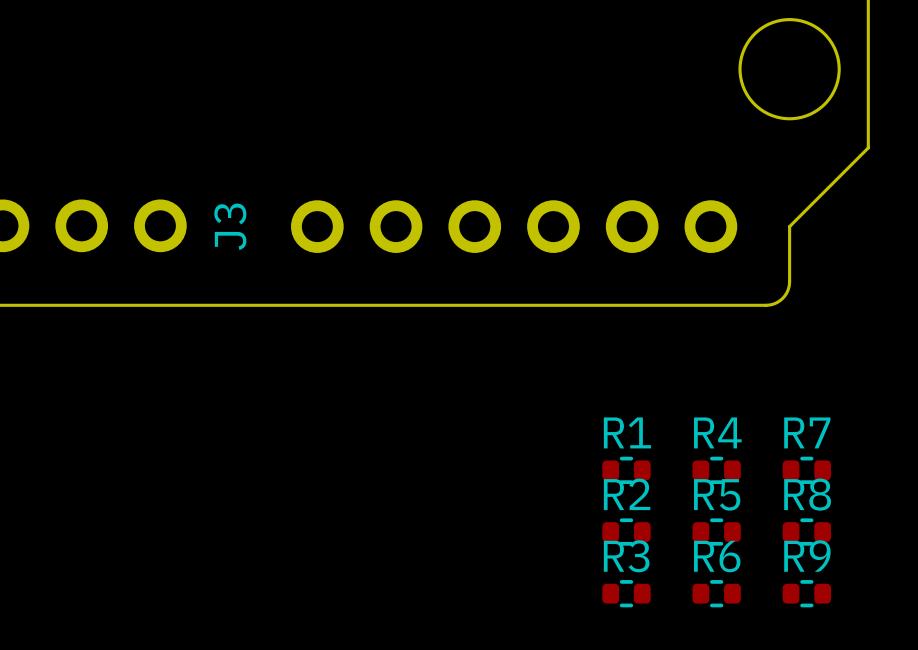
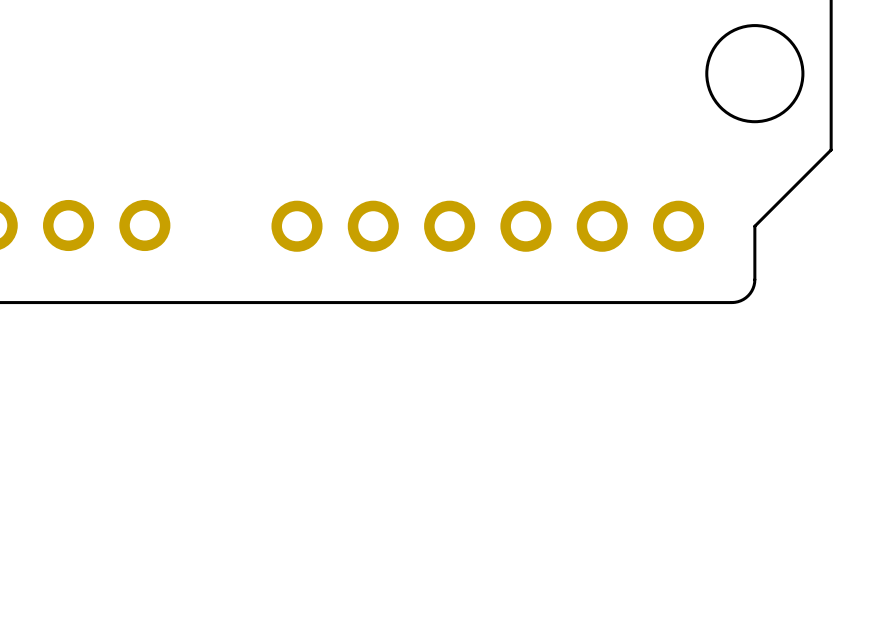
J3 name: J3 (230, 226) -> none
R1: (626, 470) -> none
R4: (716, 470) -> none
R7: (806, 470) -> none
R2: (626, 532) -> none
R5: (716, 532) -> none
R8: (806, 532) -> none
R3: (626, 593) -> none
R6: (716, 593) -> none
R9: (806, 593) -> none

